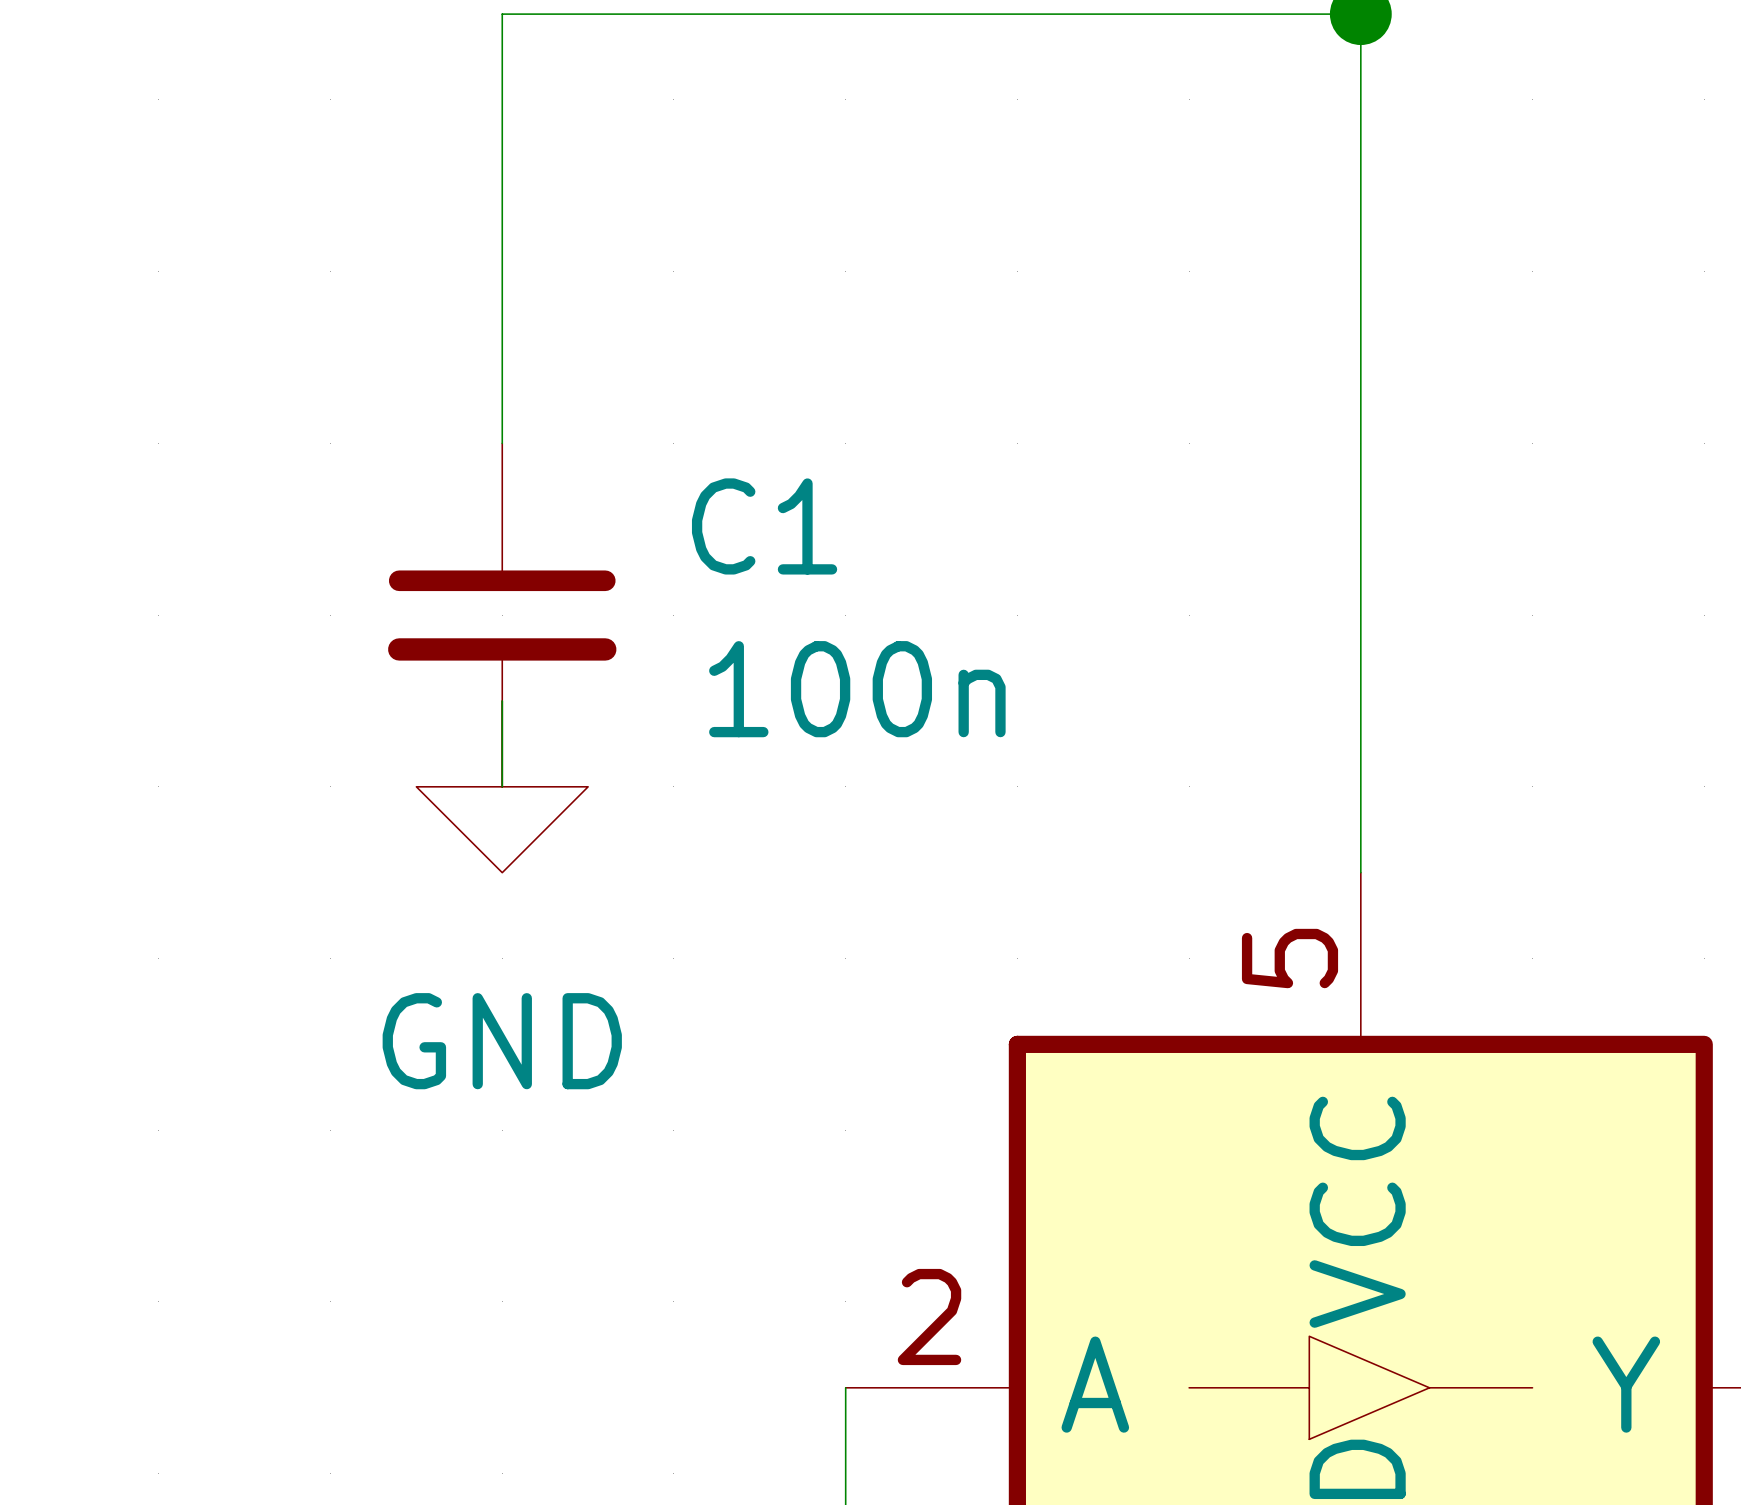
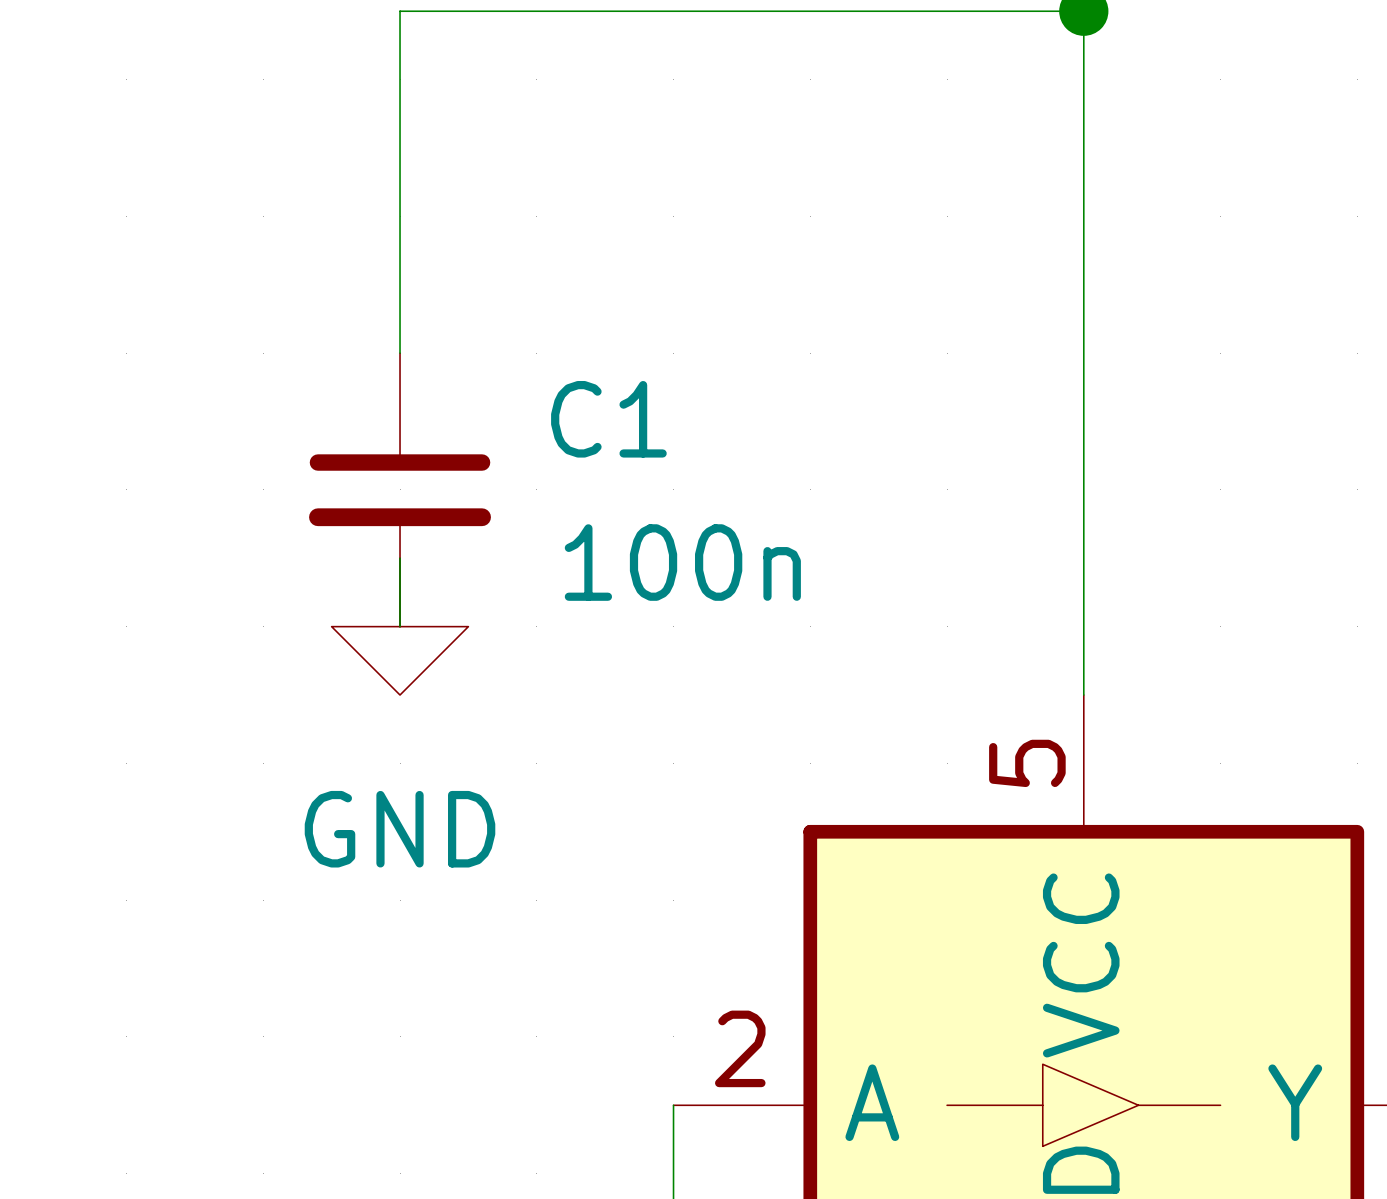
C1 value position: 100n (857, 689) -> 100n (682, 562)

